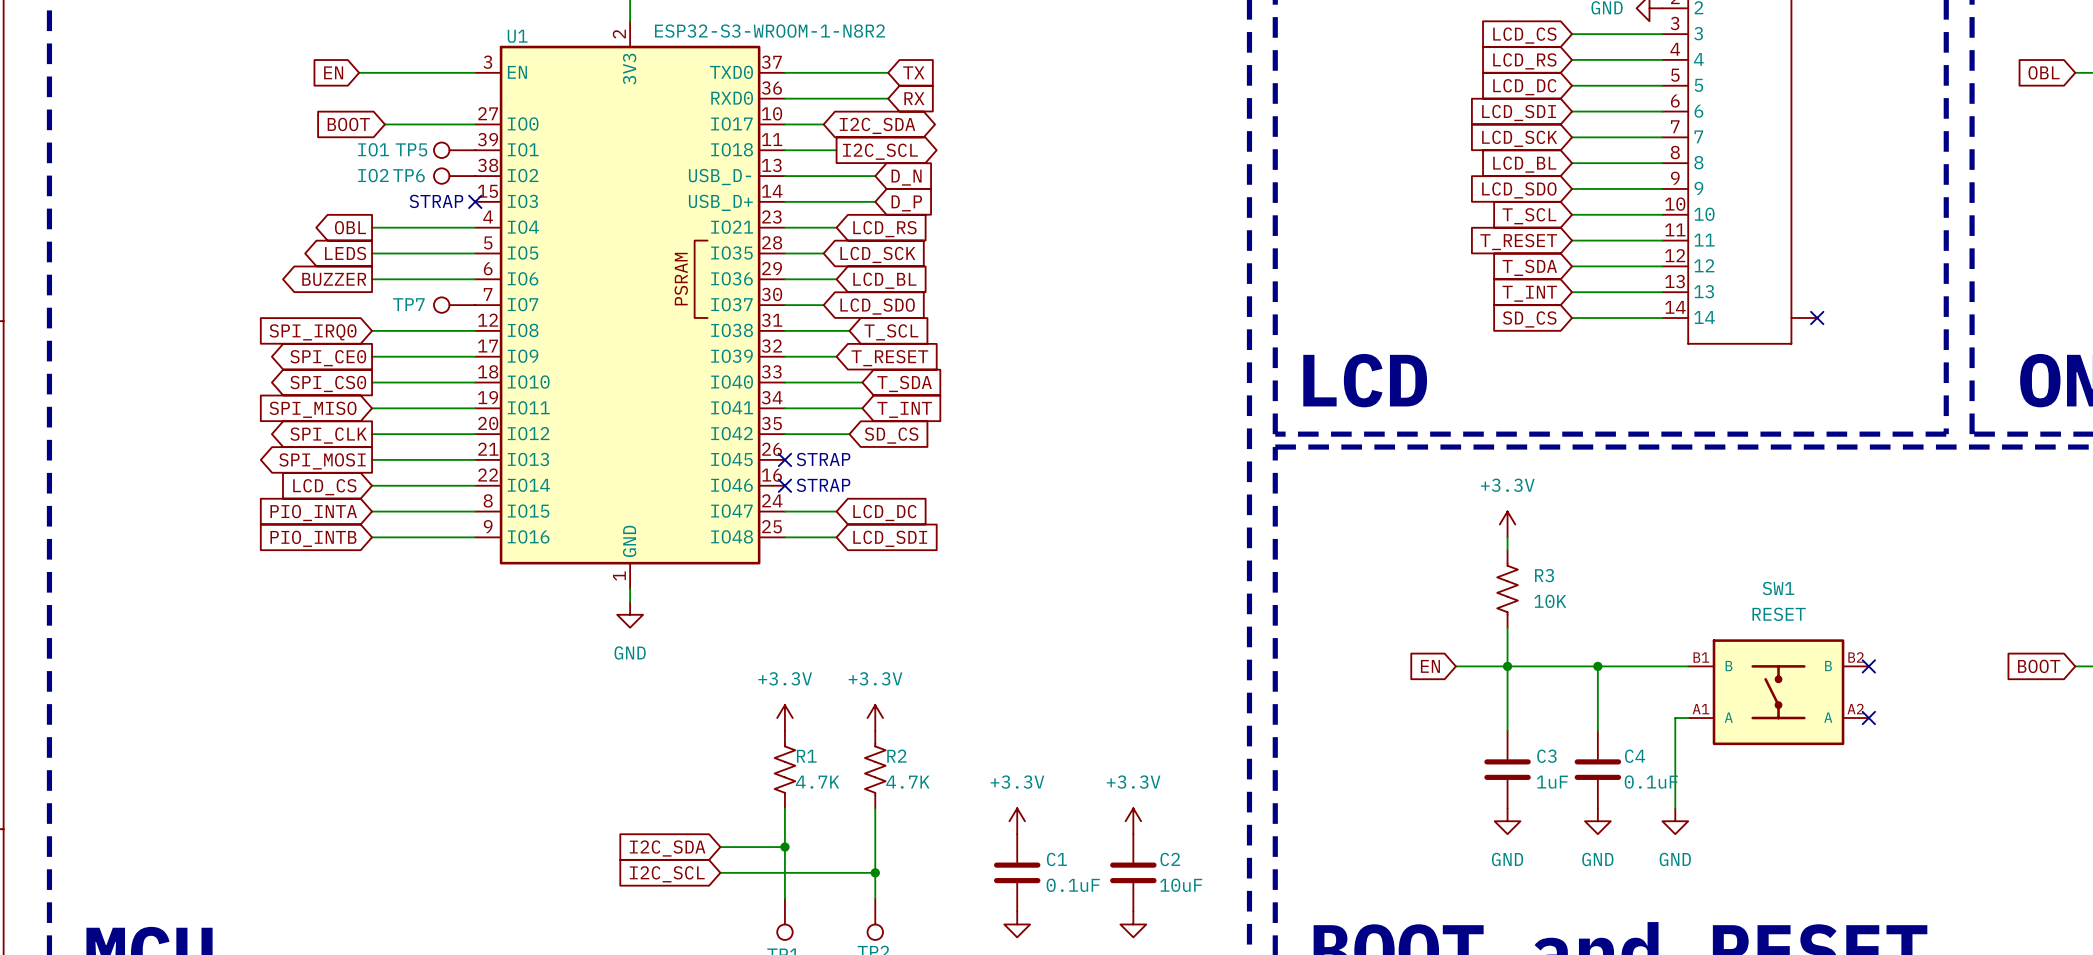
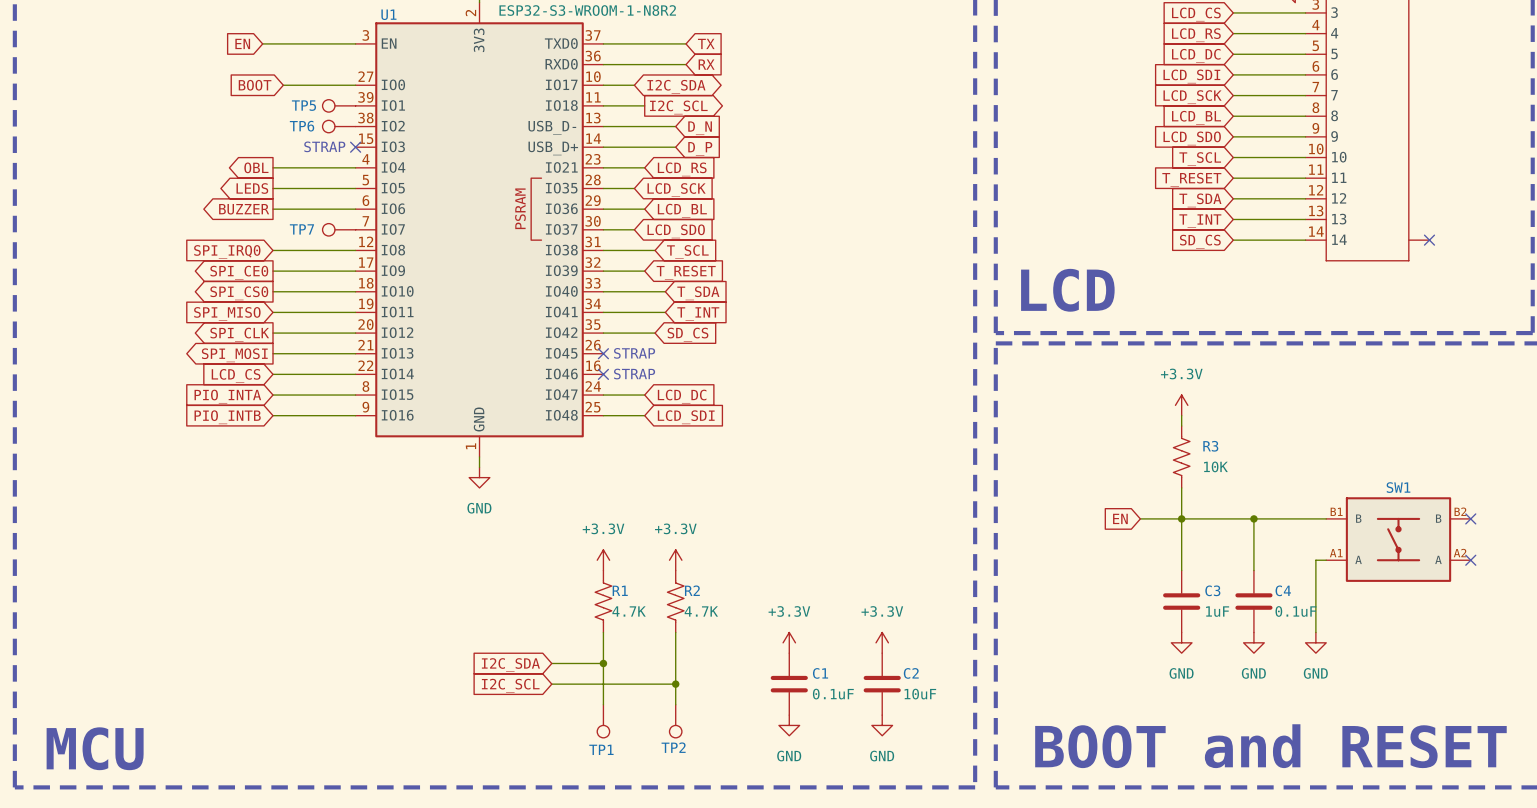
TP5 value: IO1 (373, 149) -> none
TP6 value: IO2 (373, 175) -> none
SW1 name position: SW1 (1778, 588) -> SW1 (1398, 487)
SW1 value: RESET (1779, 614) -> none

